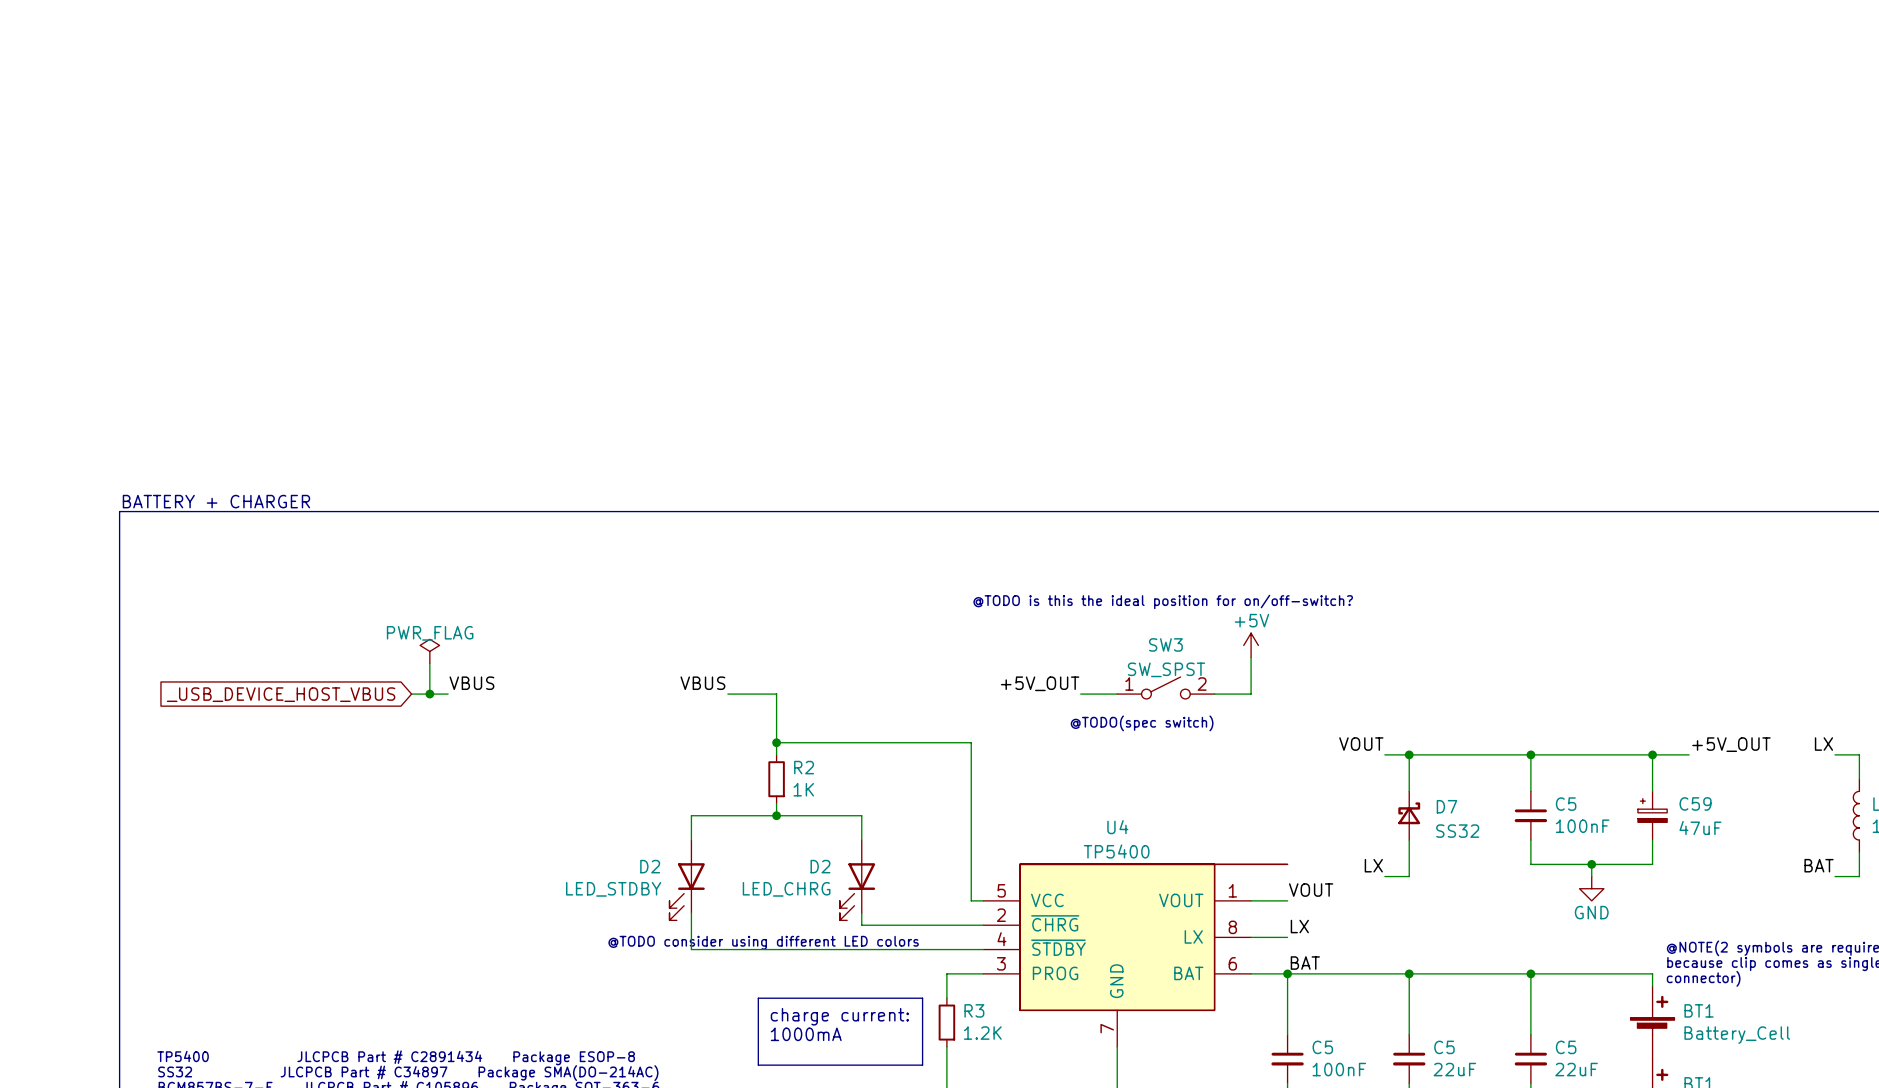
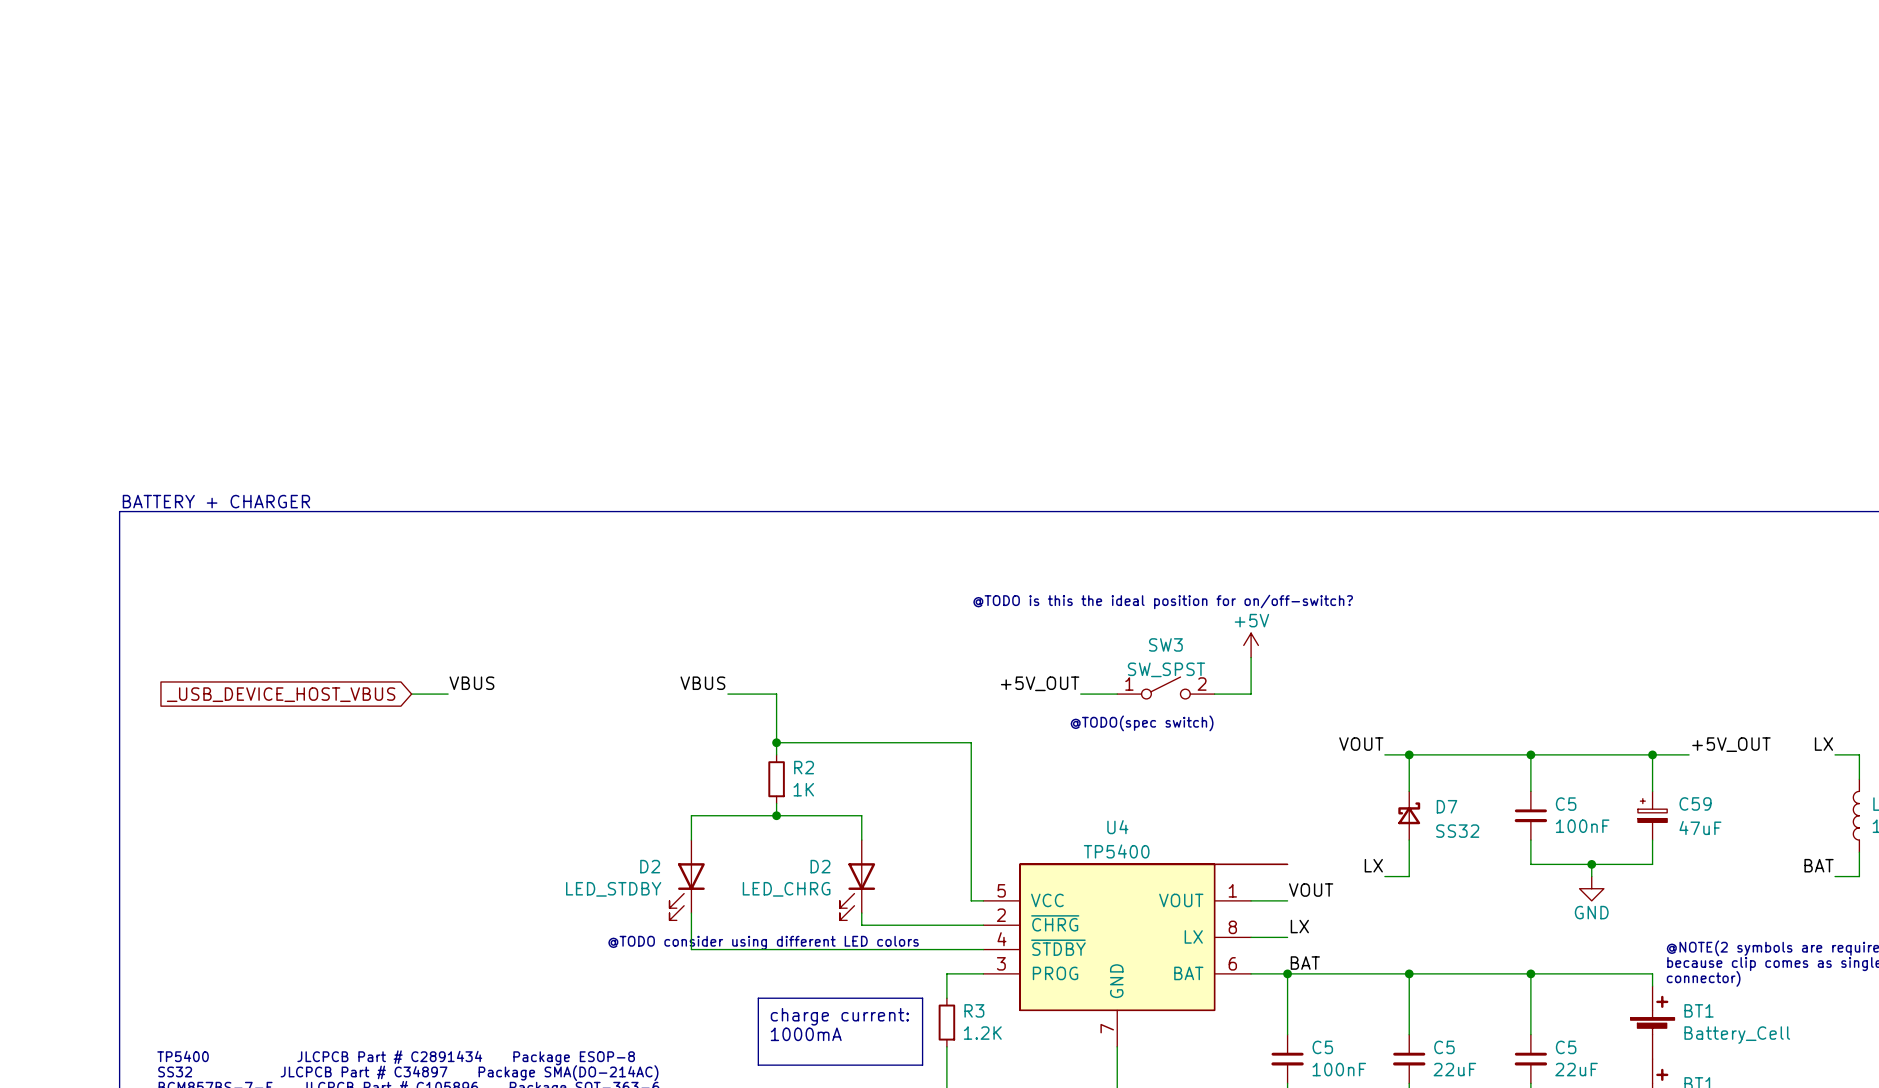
power symbol: PWR_FLAG (429, 651) -> none
wire: (429, 663) (429, 694) -> none
junction: (429, 694) -> none

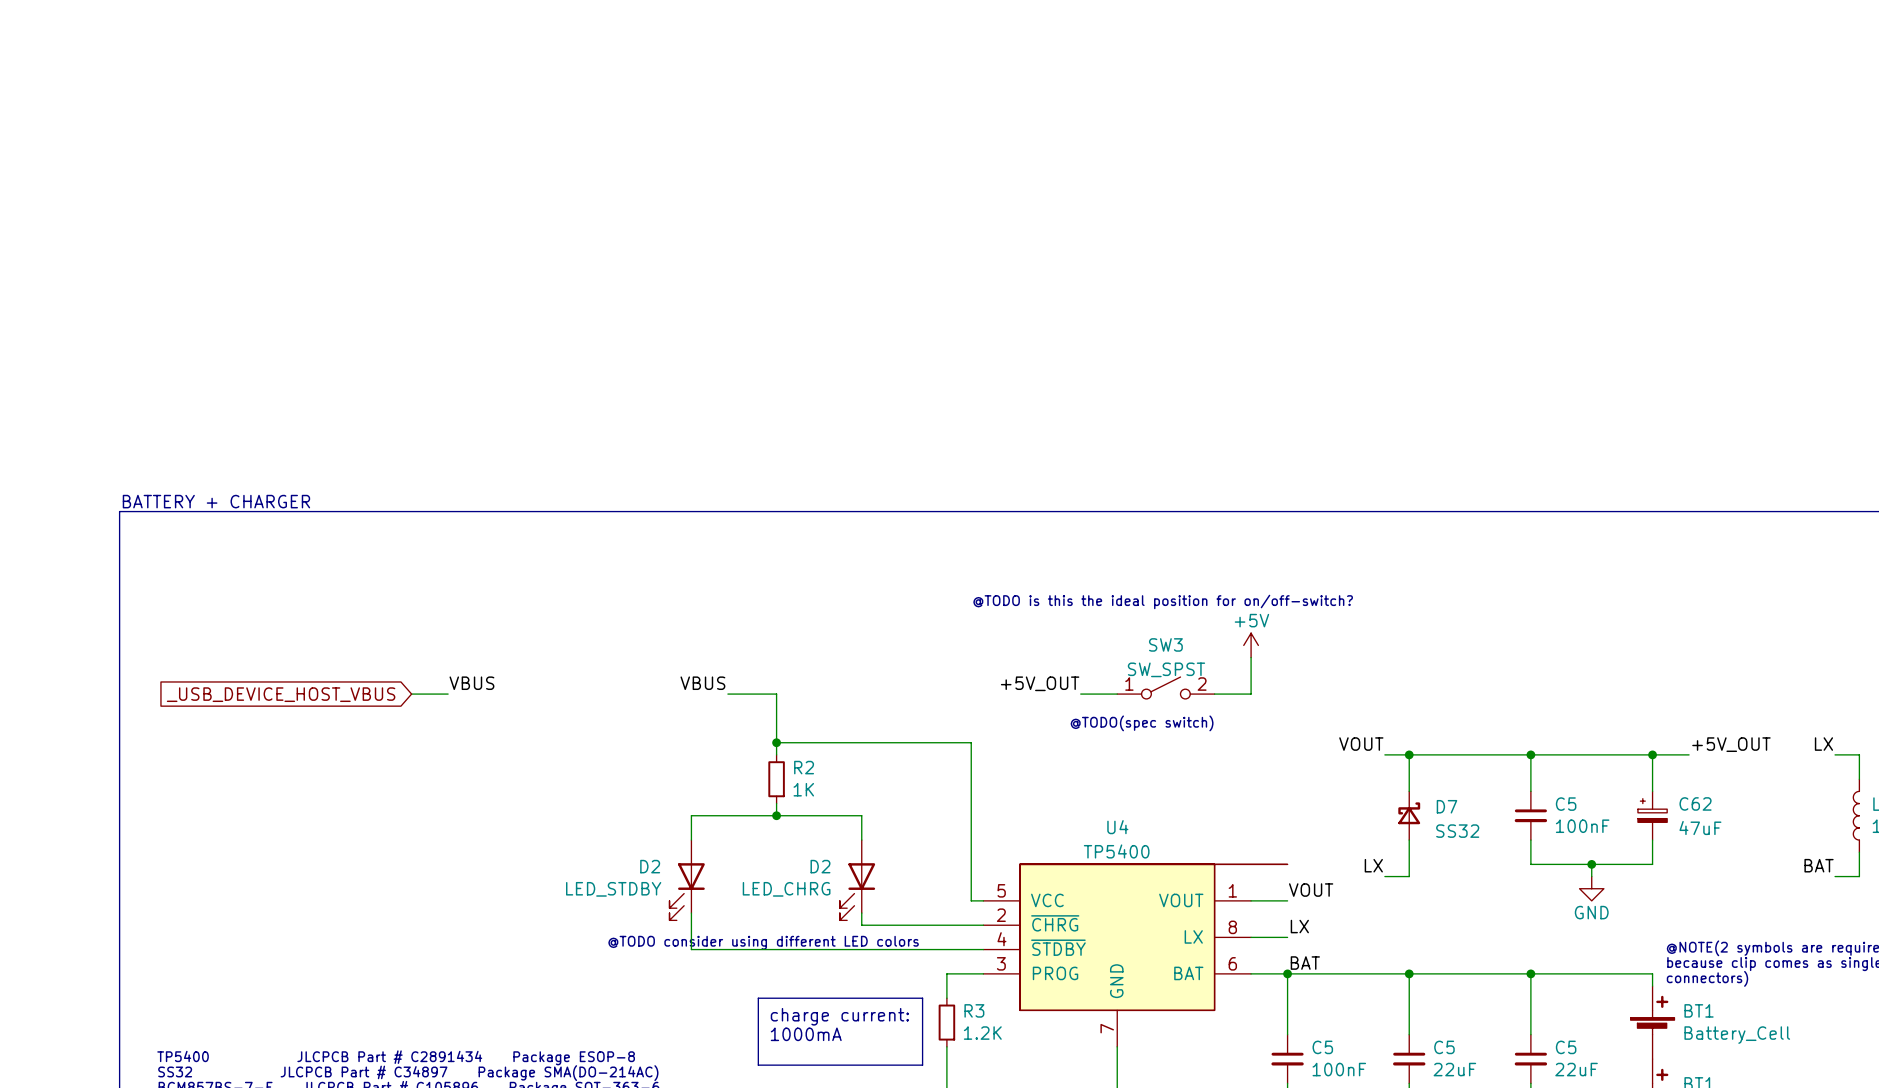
C59 name: C59 (1695, 803) -> C62 (1695, 803)
text: connector) (1703, 978) -> connectors) (1707, 978)

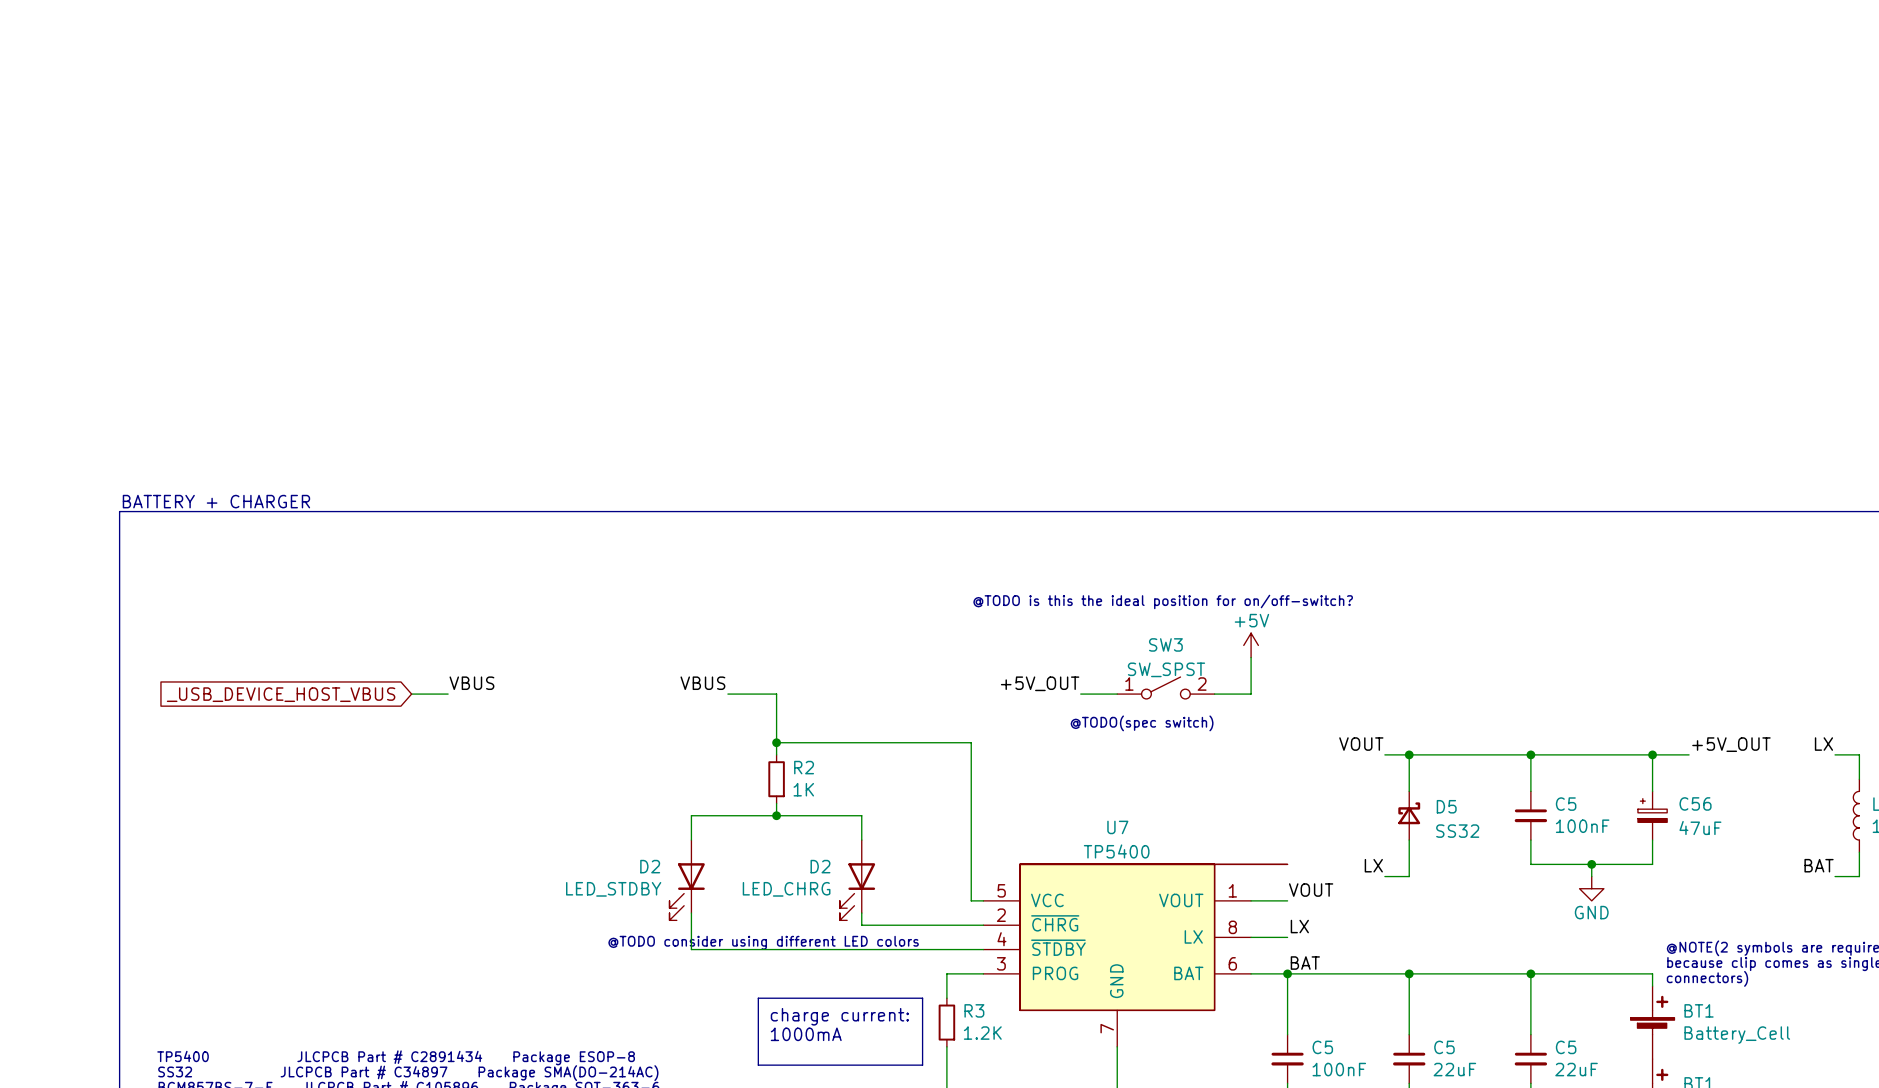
C62 name: C62 (1695, 803) -> C56 (1695, 803)
D7 name: D7 (1446, 806) -> D5 (1446, 806)
U4 name: U4 (1117, 827) -> U7 (1117, 827)

